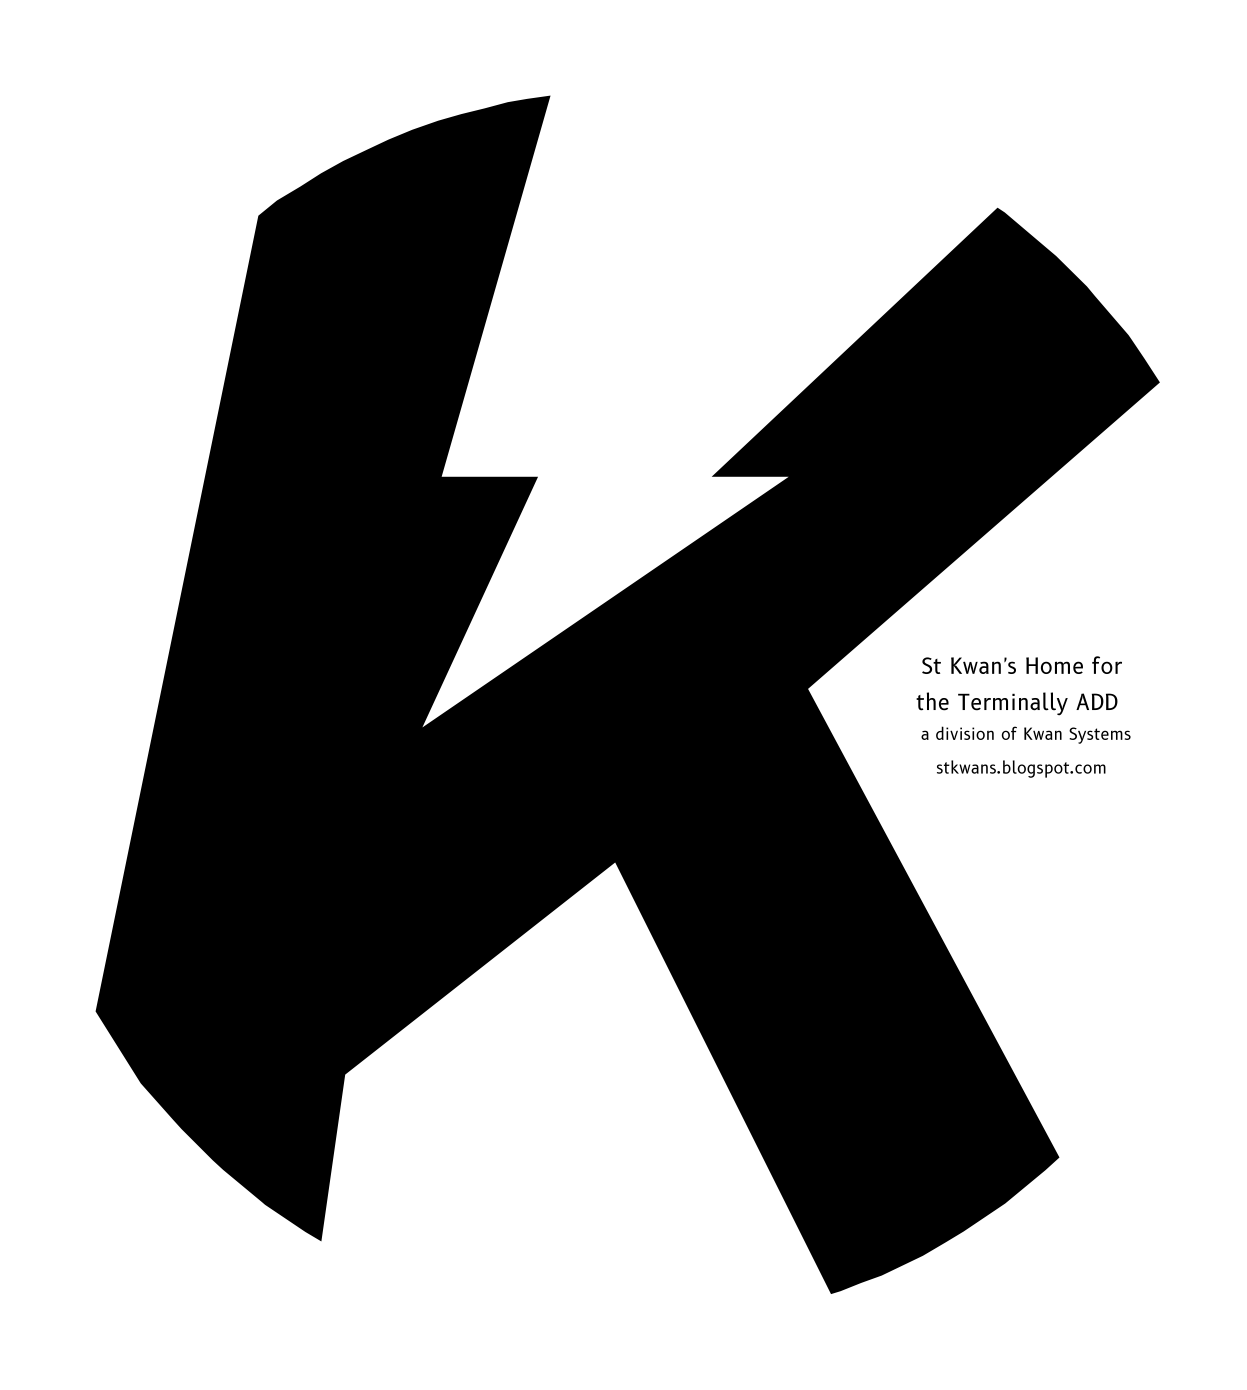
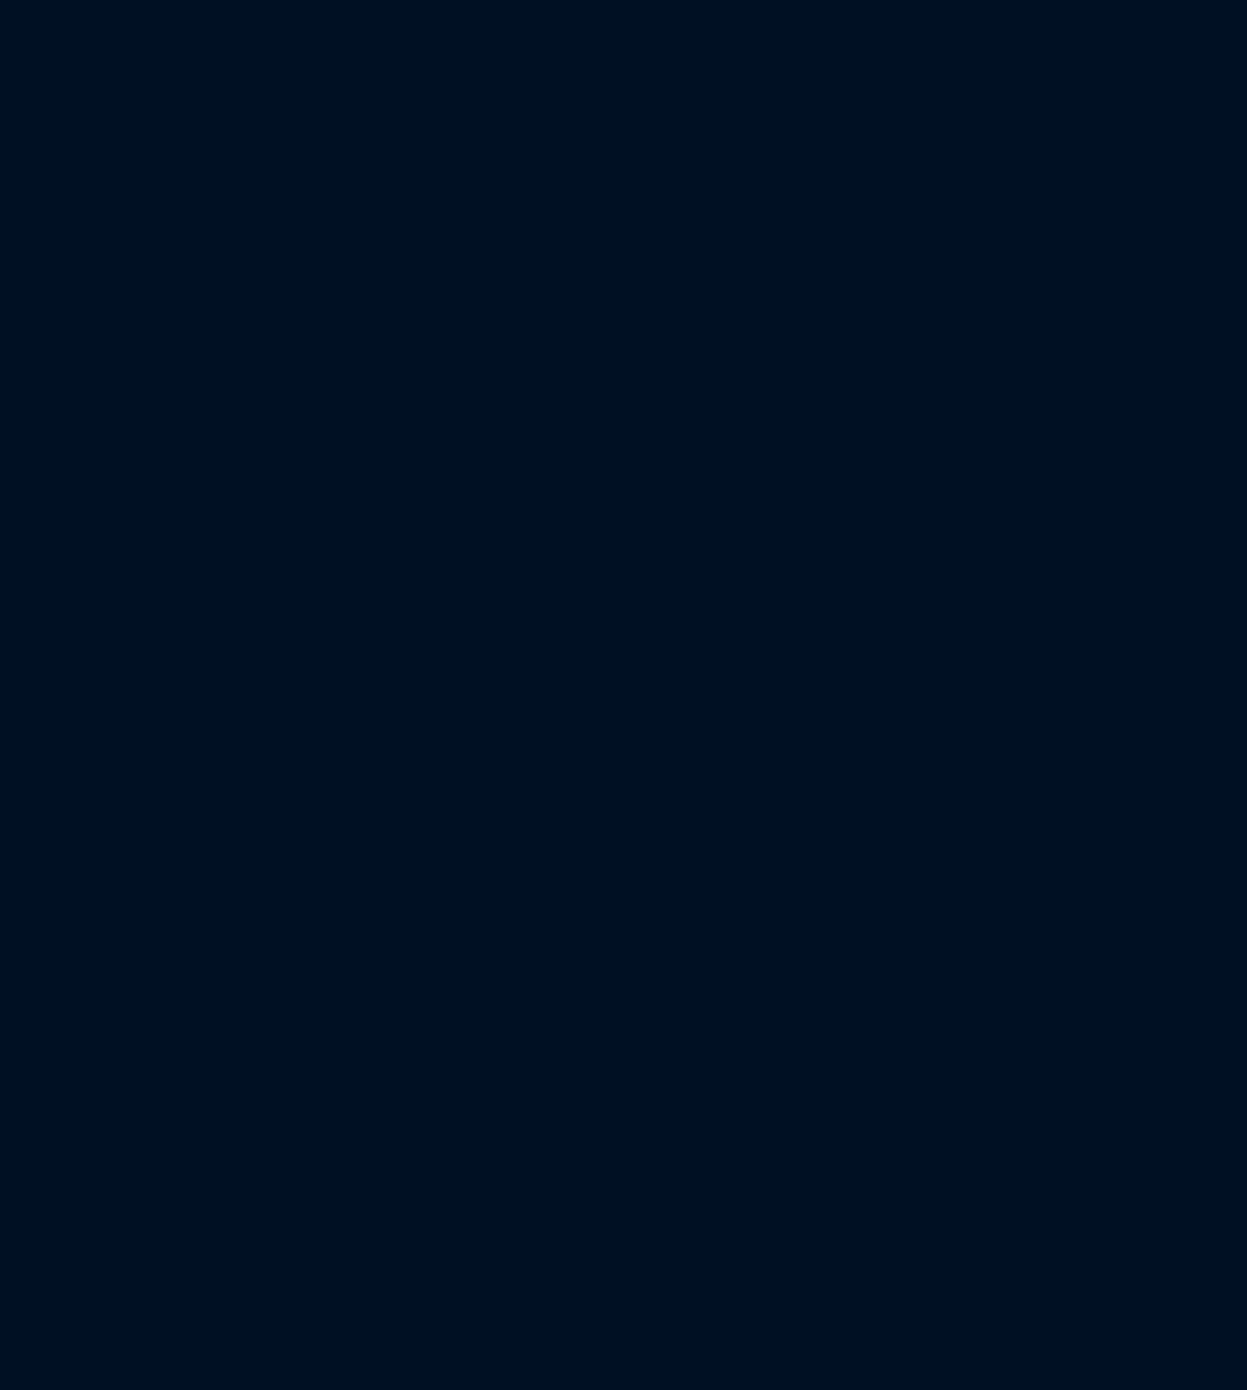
drawing: [95, 95, 1160, 1295] -> none

